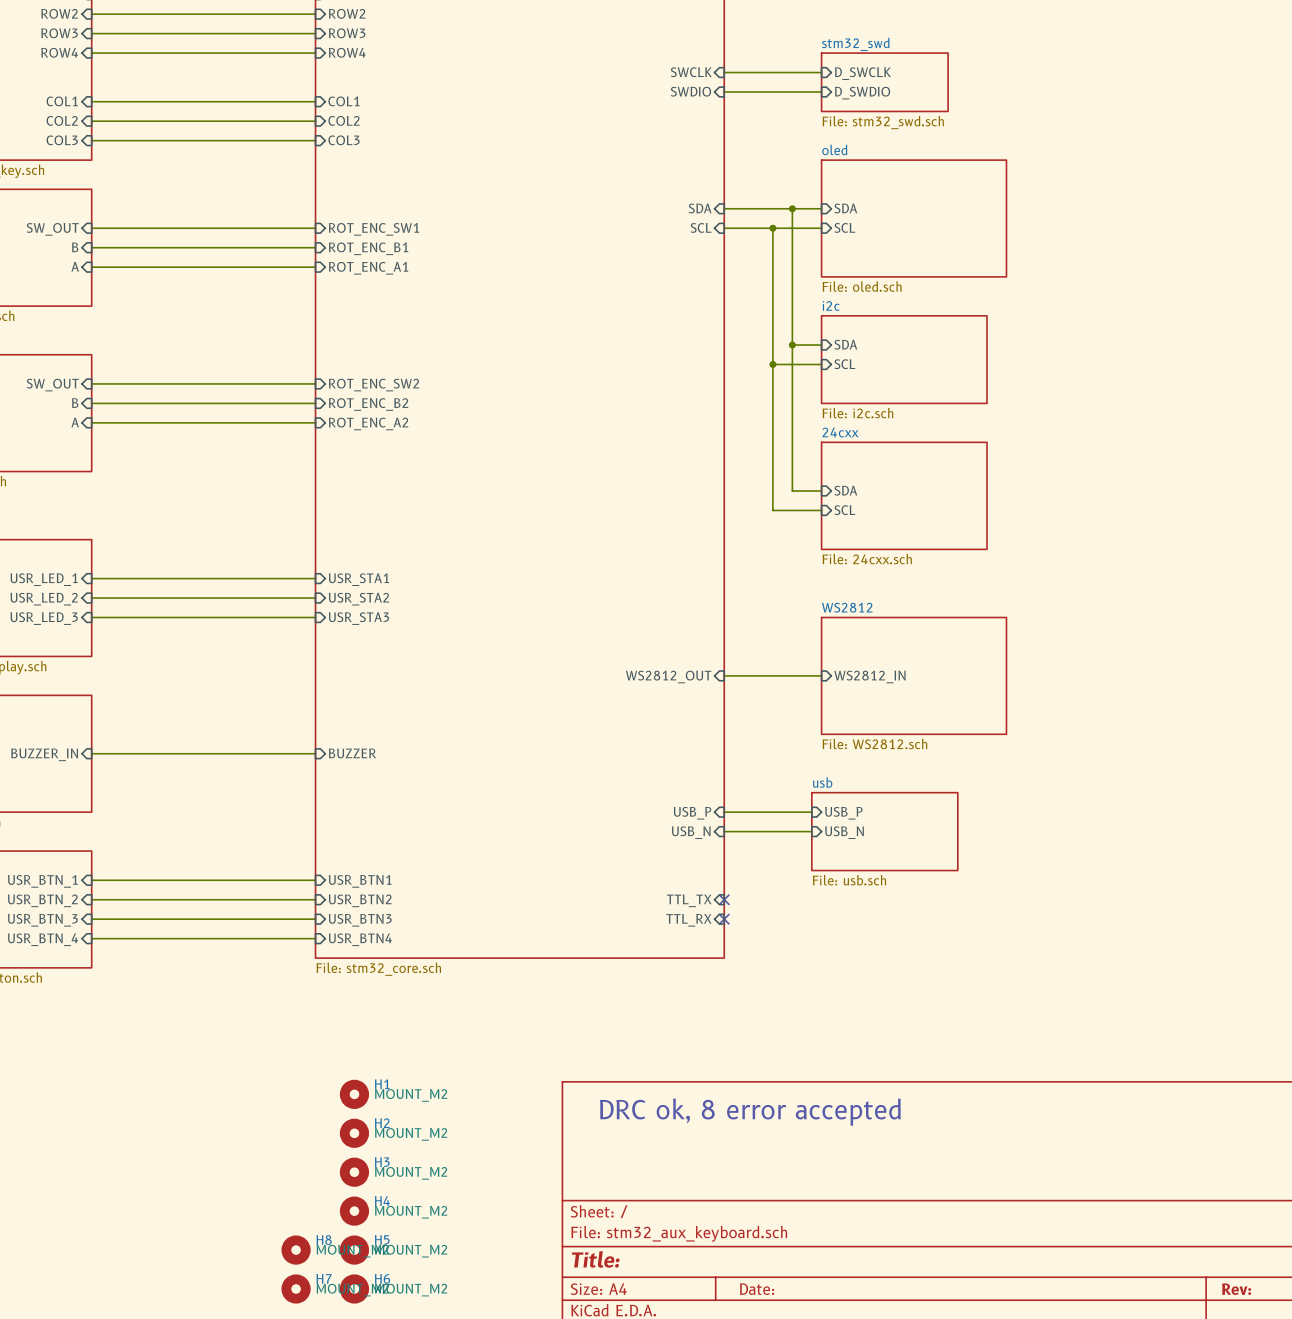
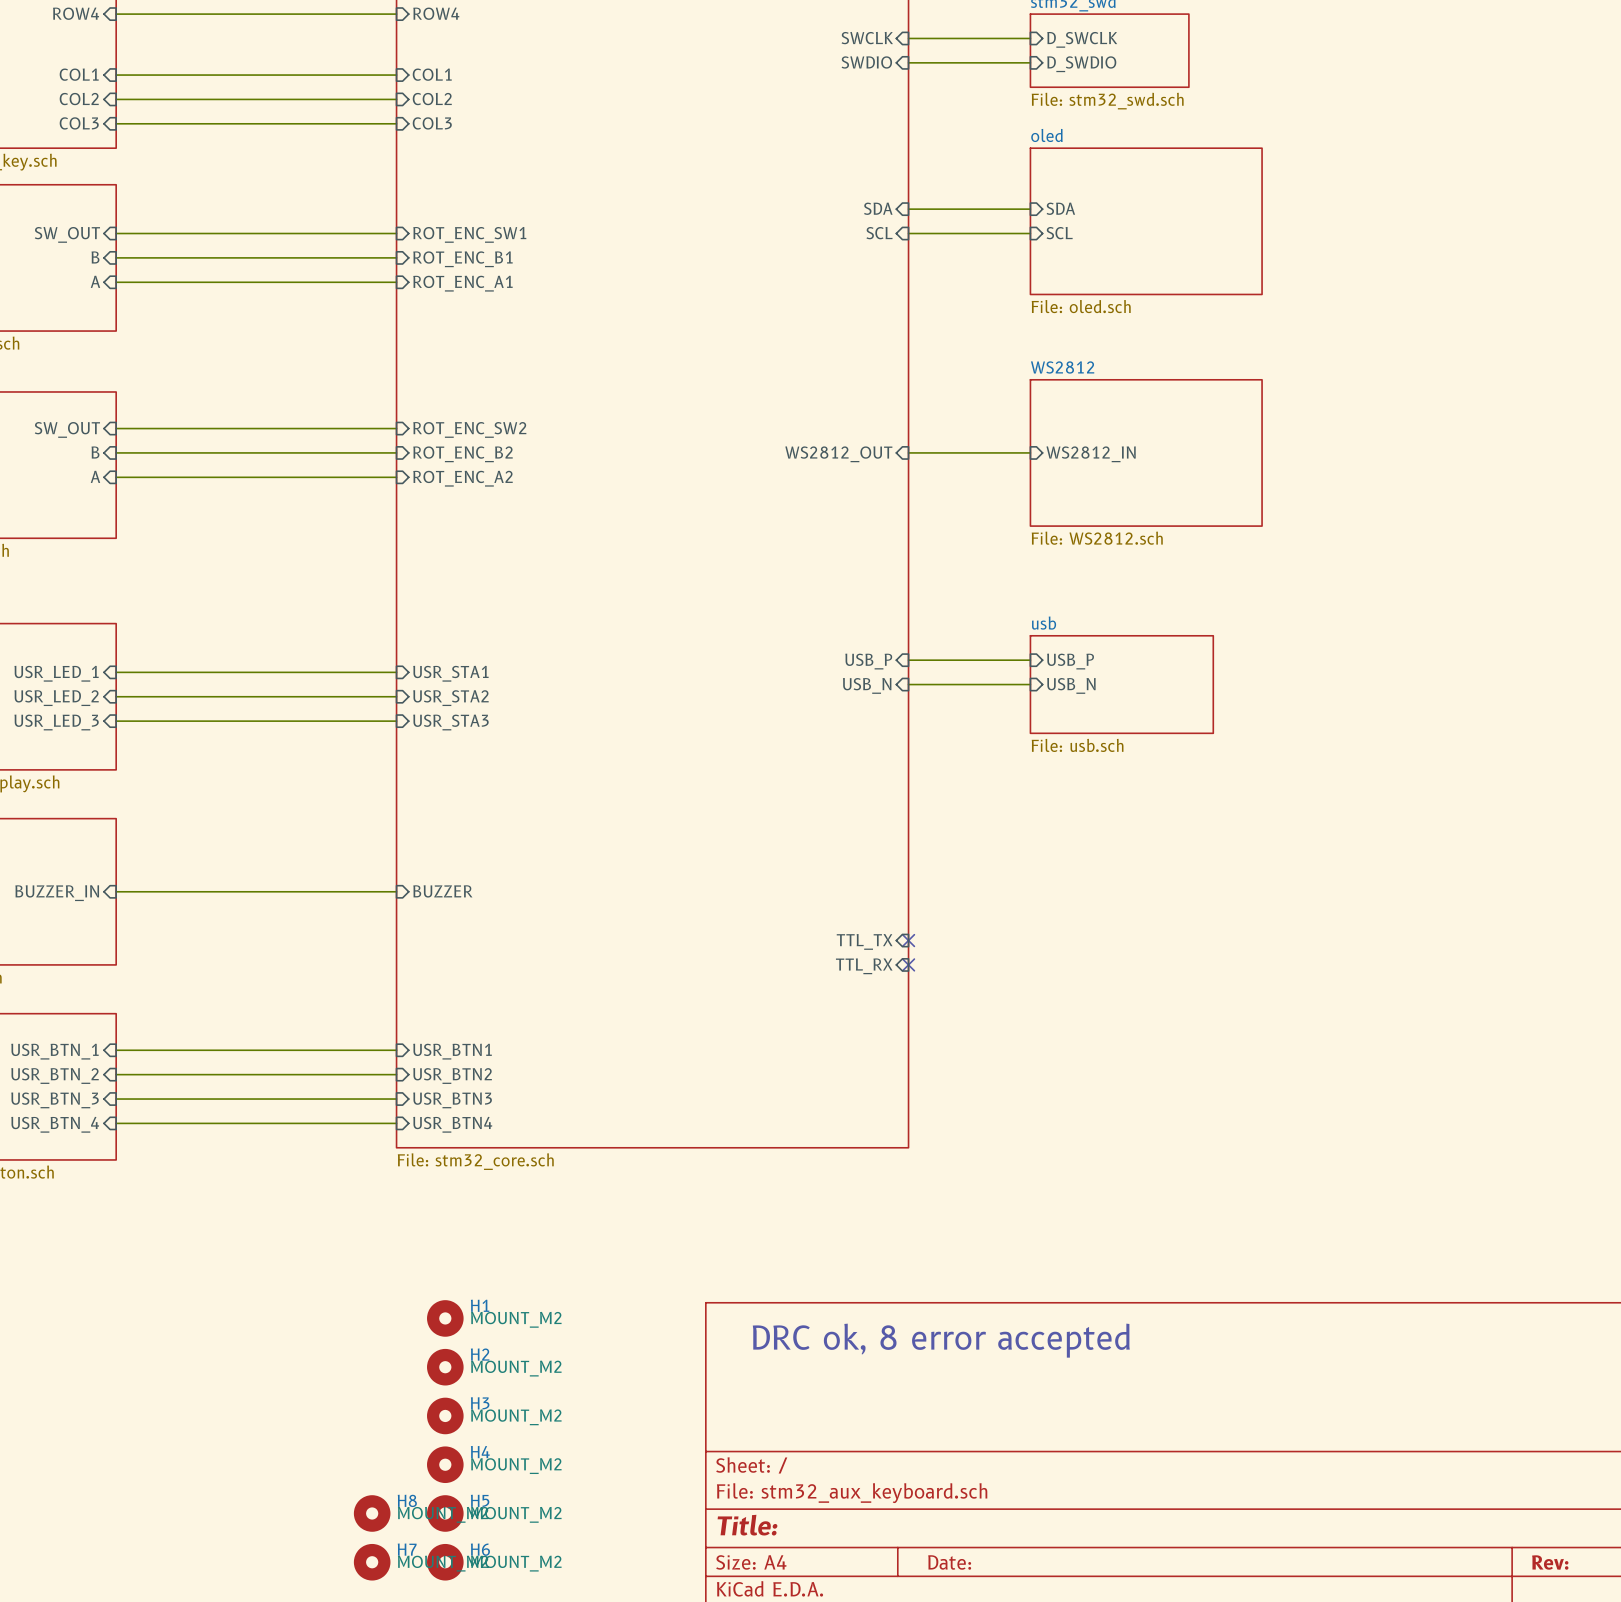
wire: (792, 208) (792, 491) (821, 491) -> none
junction: (792, 208) -> none
wire: (772, 228) (772, 510) (821, 510) -> none
junction: (772, 228) -> none
sheet pin: SDA (845, 344) -> none
wire: (792, 345) (821, 345) -> none
junction: (792, 345) -> none
sheet i2c: File: i2c.sch (904, 359) -> none
wire: (772, 364) (821, 364) -> none
junction: (772, 364) -> none
sheet pin: SCL (844, 364) -> none
wire: none -> (908, 452) (1030, 452)
sheet pin: none -> WS2812_OUT (838, 454)
sheet pin: none -> WS2812_IN (1091, 454)
sheet pin: SDA (845, 490) -> none
sheet 24cxx: File: 24cxx.sch (904, 495) -> none
sheet pin: SCL (844, 510) -> none
wire: none -> (908, 660) (1030, 660)
sheet pin: none -> USB_P (868, 661)
sheet pin: none -> USB_P (1070, 661)
sheet usb: none -> File: usb.sch (1121, 684)
sheet pin: none -> USB_N (867, 685)
sheet pin: none -> USB_N (1071, 685)
wire: (724, 675) (821, 675) -> (908, 684) (1030, 684)
sheet WS2812 position: (914, 675) -> (1146, 452)
sheet pin: WS2812_OUT (668, 676) -> none
sheet pin: WS2812_IN (869, 676) -> none
no-connect mark: none -> (908, 940)
wire: (724, 812) (811, 812) -> none
no-connect mark: none -> (908, 964)
sheet pin: USB_P (692, 813) -> TTL_RX (864, 966)
sheet pin: USB_P (843, 813) -> none
wire: (724, 831) (811, 831) -> none
sheet usb: File: usb.sch (884, 831) -> none
sheet pin: USB_N (691, 832) -> none
sheet pin: USB_N (844, 832) -> none
no-connect mark: (724, 899) -> none
sheet pin position: TTL_TX (689, 900) -> TTL_TX (864, 941)
no-connect mark: (724, 919) -> none
sheet pin: TTL_RX (688, 920) -> none

